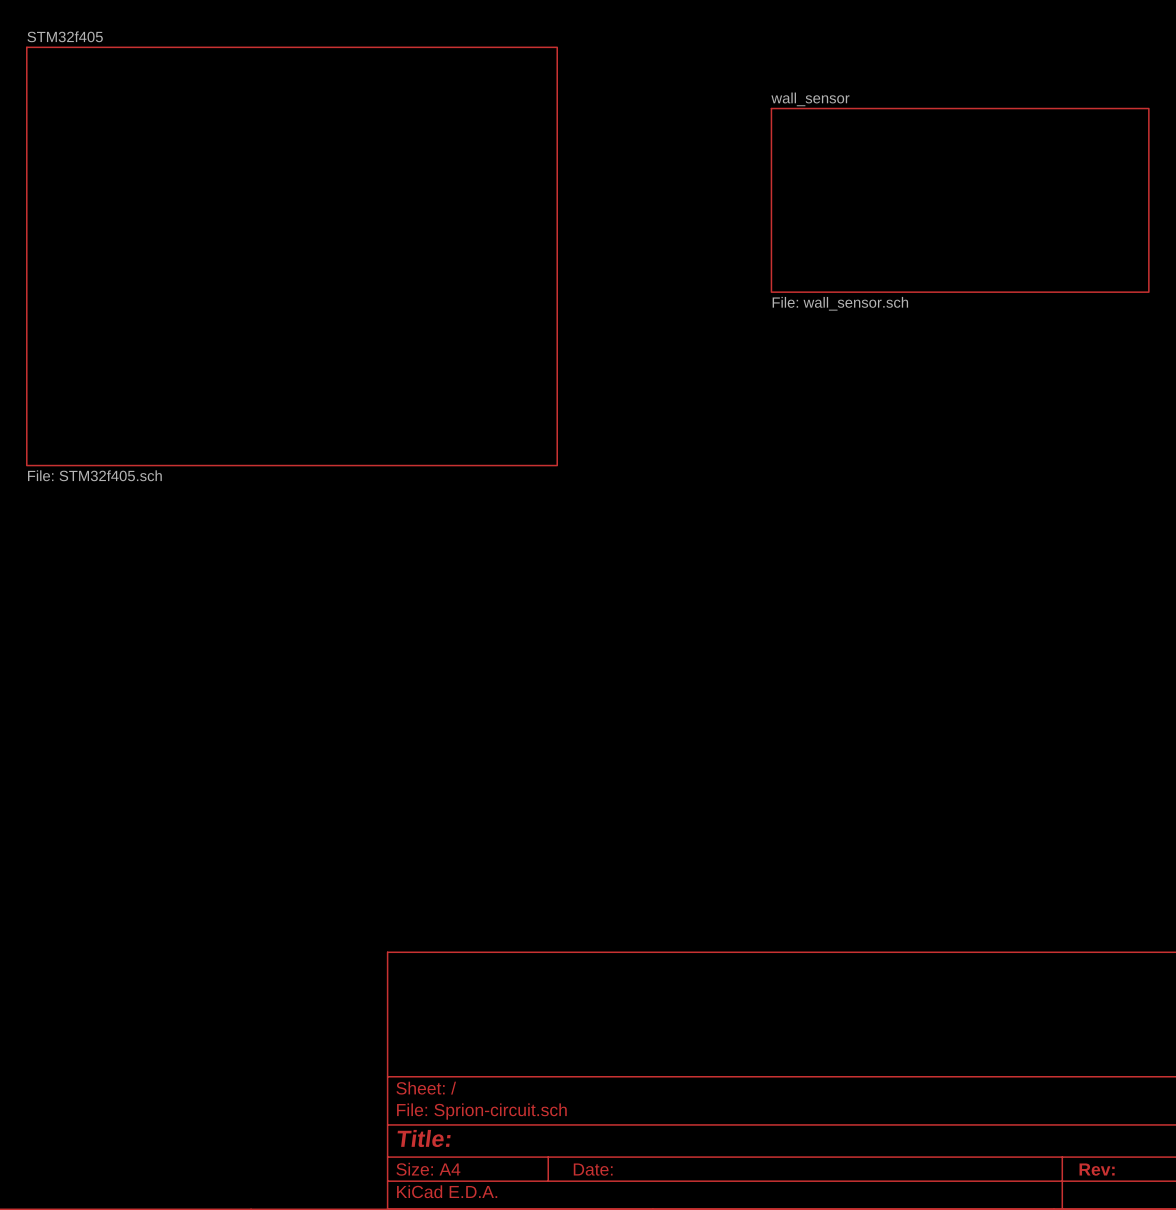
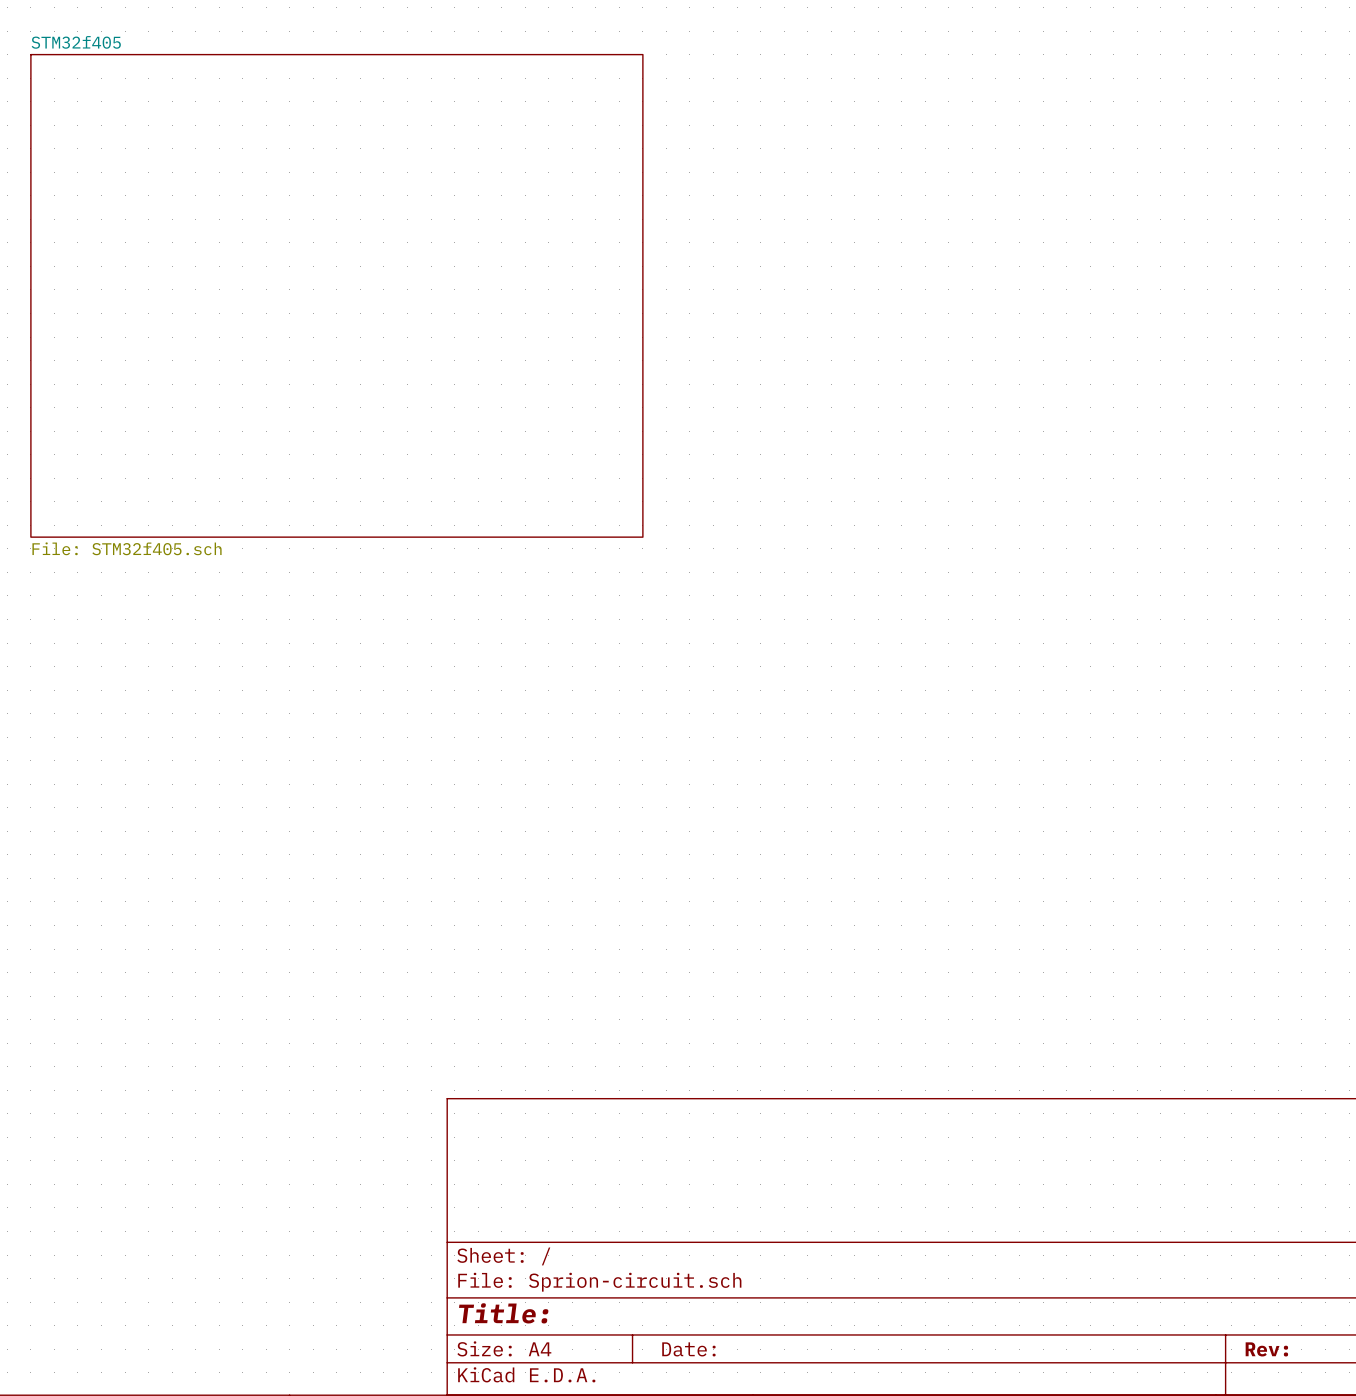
sheet wall_sensor: File: wall_sensor.sch (960, 200) -> none

